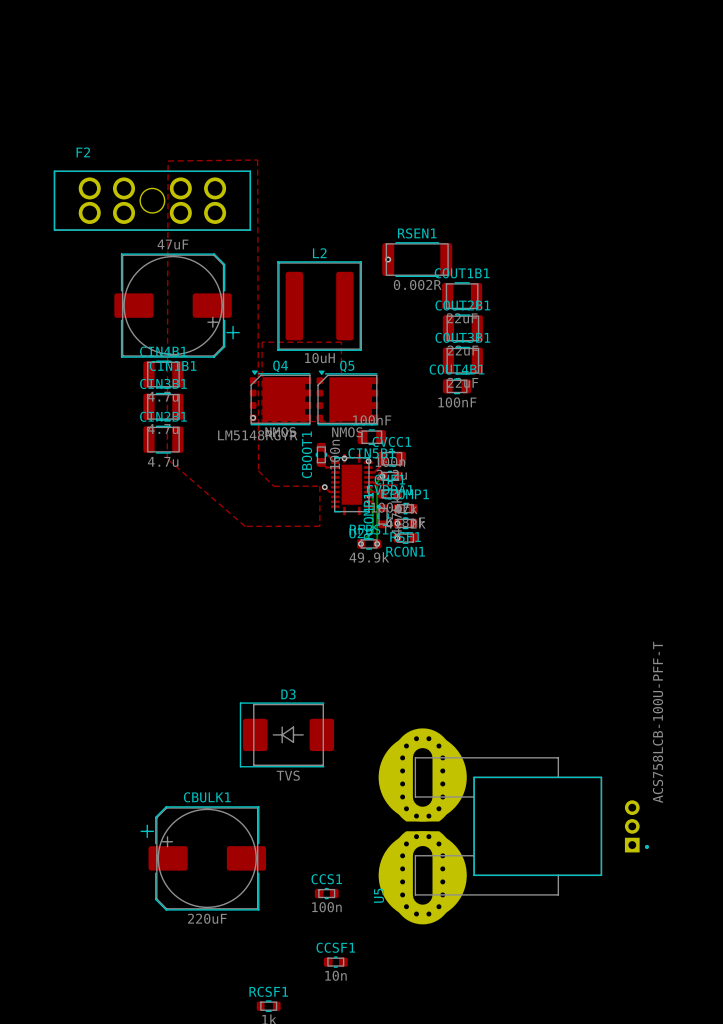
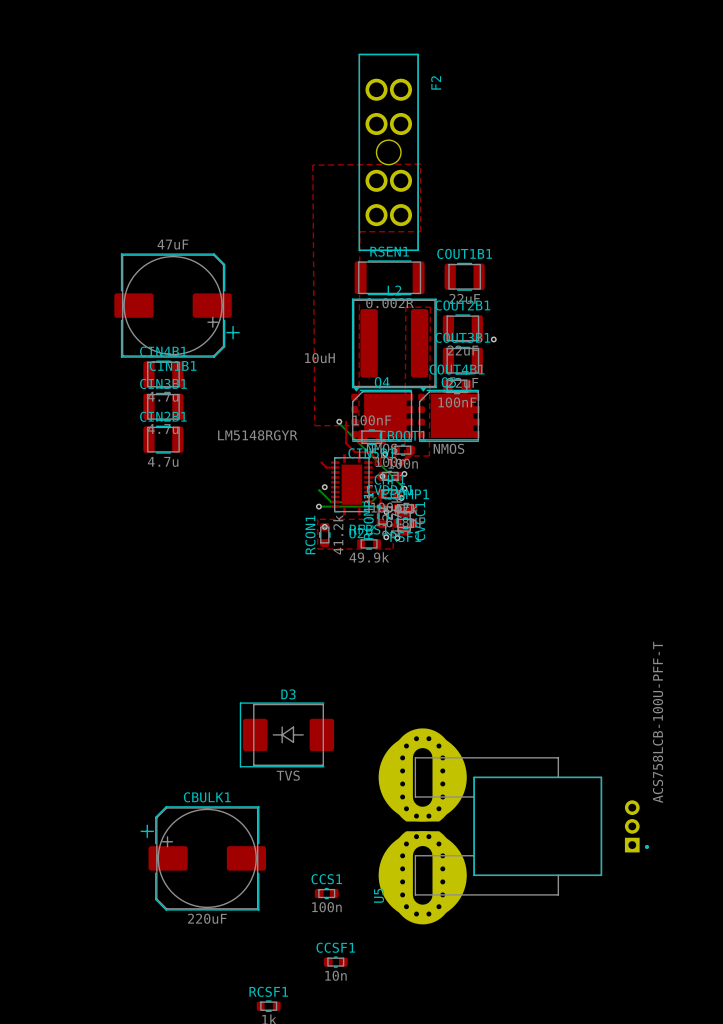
top zone outline: (257, 160) (168, 161) (167, 458) (245, 526) (319, 526) (319, 486) (273, 486) (258, 470) (257, 160) -> none
top zone outline: none -> (420, 164) (312, 165) (314, 425) (358, 425) (359, 231) (420, 231) (420, 164)
F2 rotation: 0° (152, 200) -> 90° clockwise (388, 152)
F2 position: (152, 200) -> (388, 152)
via: (388, 259) -> none
RSEN1 position: (417, 259) -> (389, 277)
COUT1B1 position: (462, 296) -> (464, 276)
L2 position: (319, 306) -> (394, 343)
top zone outline: none -> (405, 307) (404, 456) (429, 456) (430, 307) (405, 307)
via: none -> (493, 339)
top zone outline: (262, 342) (341, 342) (341, 421) (262, 421) (262, 342) -> none
Q4 position: (280, 397) -> (382, 414)
Q5 position: (347, 397) -> (448, 414)
via: (253, 417) -> none
bottom track: none -> (339, 421) (404, 488)
via: none -> (339, 421)
top track: none -> (346, 421) (346, 443) (354, 452) (369, 452) (375, 457) (375, 464)
top track: (321, 447) (335, 462) -> none
top track: none -> (395, 450) (395, 464)
top track: none -> (410, 450) (410, 454) (400, 464)
CBOOT1 rotation: 0° (321, 454) -> 90° clockwise (402, 450)
CBOOT1 position: (321, 454) -> (402, 450)
via: (344, 458) -> none
top track: (382, 458) (382, 464) (374, 472) (368, 472) -> none
CVCC1 rotation: 0° (391, 458) -> 90° clockwise (404, 521)
CVCC1 position: (391, 458) -> (404, 521)
via position: (368, 461) -> (385, 454)
top track: none -> (380, 464) (380, 458) (385, 454) (390, 459) (390, 464)
via: none -> (404, 473)
bottom track: (382, 476) (377, 482) (377, 543) -> none
top track: (368, 482) (373, 482) (376, 485) (396, 485) -> none
top track: (324, 487) (329, 492) (335, 492) -> none
bottom track: (368, 487) (372, 491) (372, 531) (361, 543) -> none
via: none -> (404, 488)
bottom track: none -> (318, 490) (331, 502) (371, 502) (375, 497)
top track: none -> (380, 497) (380, 502) (377, 505) (377, 526)
via: none -> (401, 498)
bottom track: none -> (318, 506) (380, 506) (386, 511)
via: none -> (318, 506)
via: none -> (386, 511)
top zone outline: none -> (317, 519) (393, 519) (393, 549) (317, 549) (317, 519)
via: (397, 523) -> none
via: none -> (324, 526)
via: none -> (386, 537)
RCON1 rotation: 0° (405, 538) -> 90° clockwise (324, 535)
RCON1 position: (405, 538) -> (324, 535)
via: (361, 543) -> none
via: (377, 543) -> none

